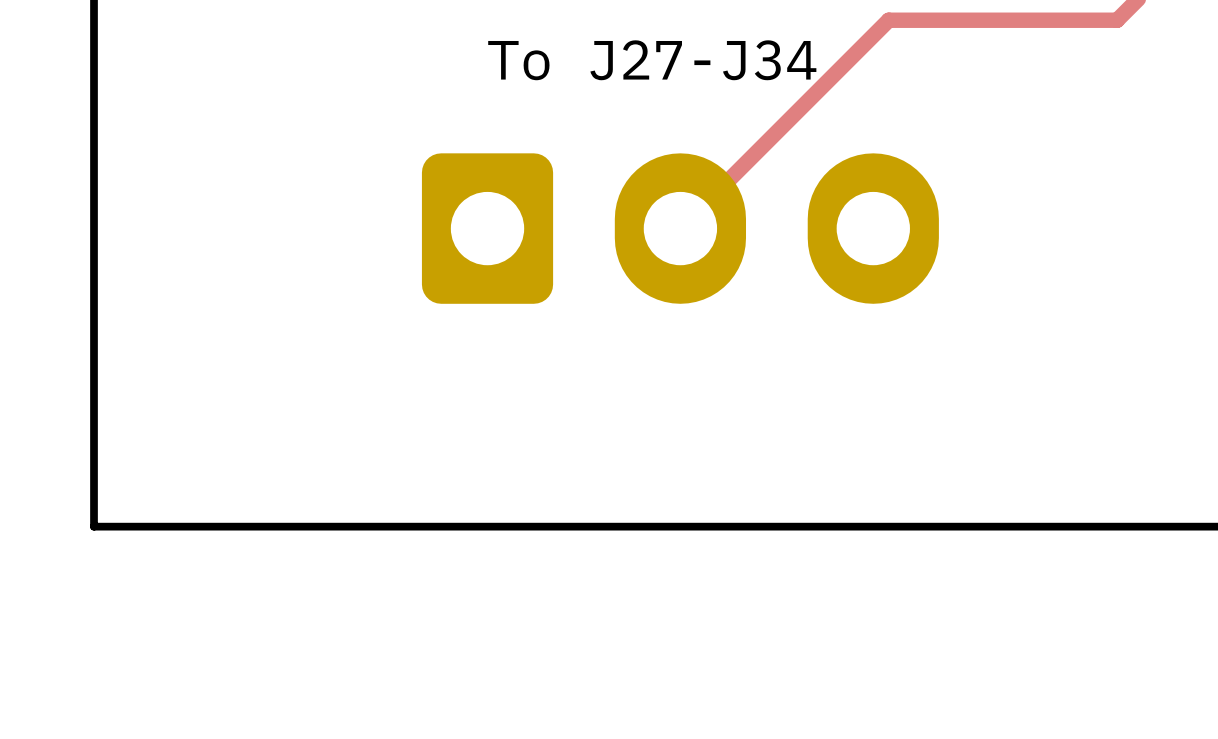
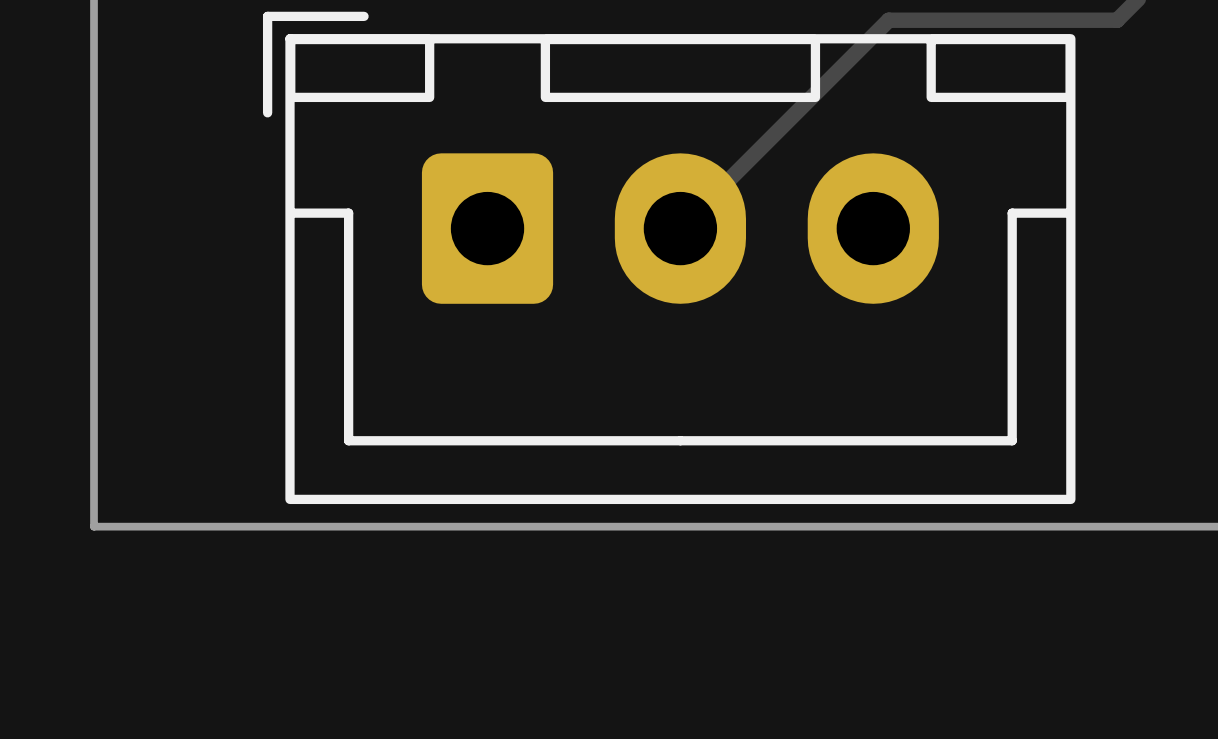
text: To J27-J34 (652, 60) -> none
part footprint: [421, 153, 939, 304] -> [262, 11, 1076, 505]

